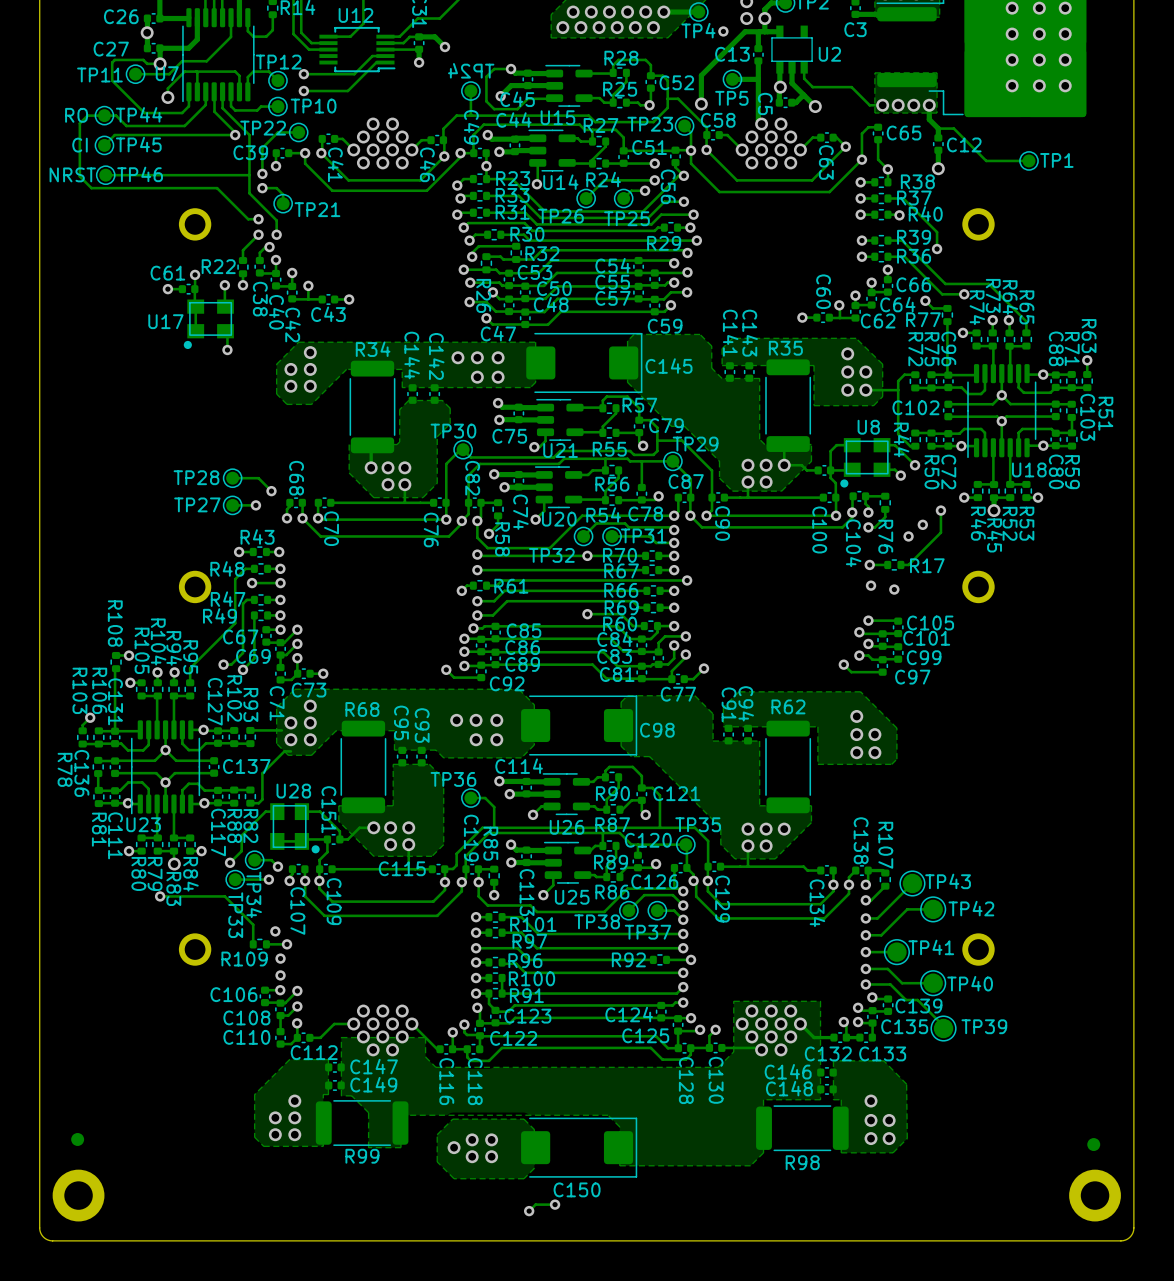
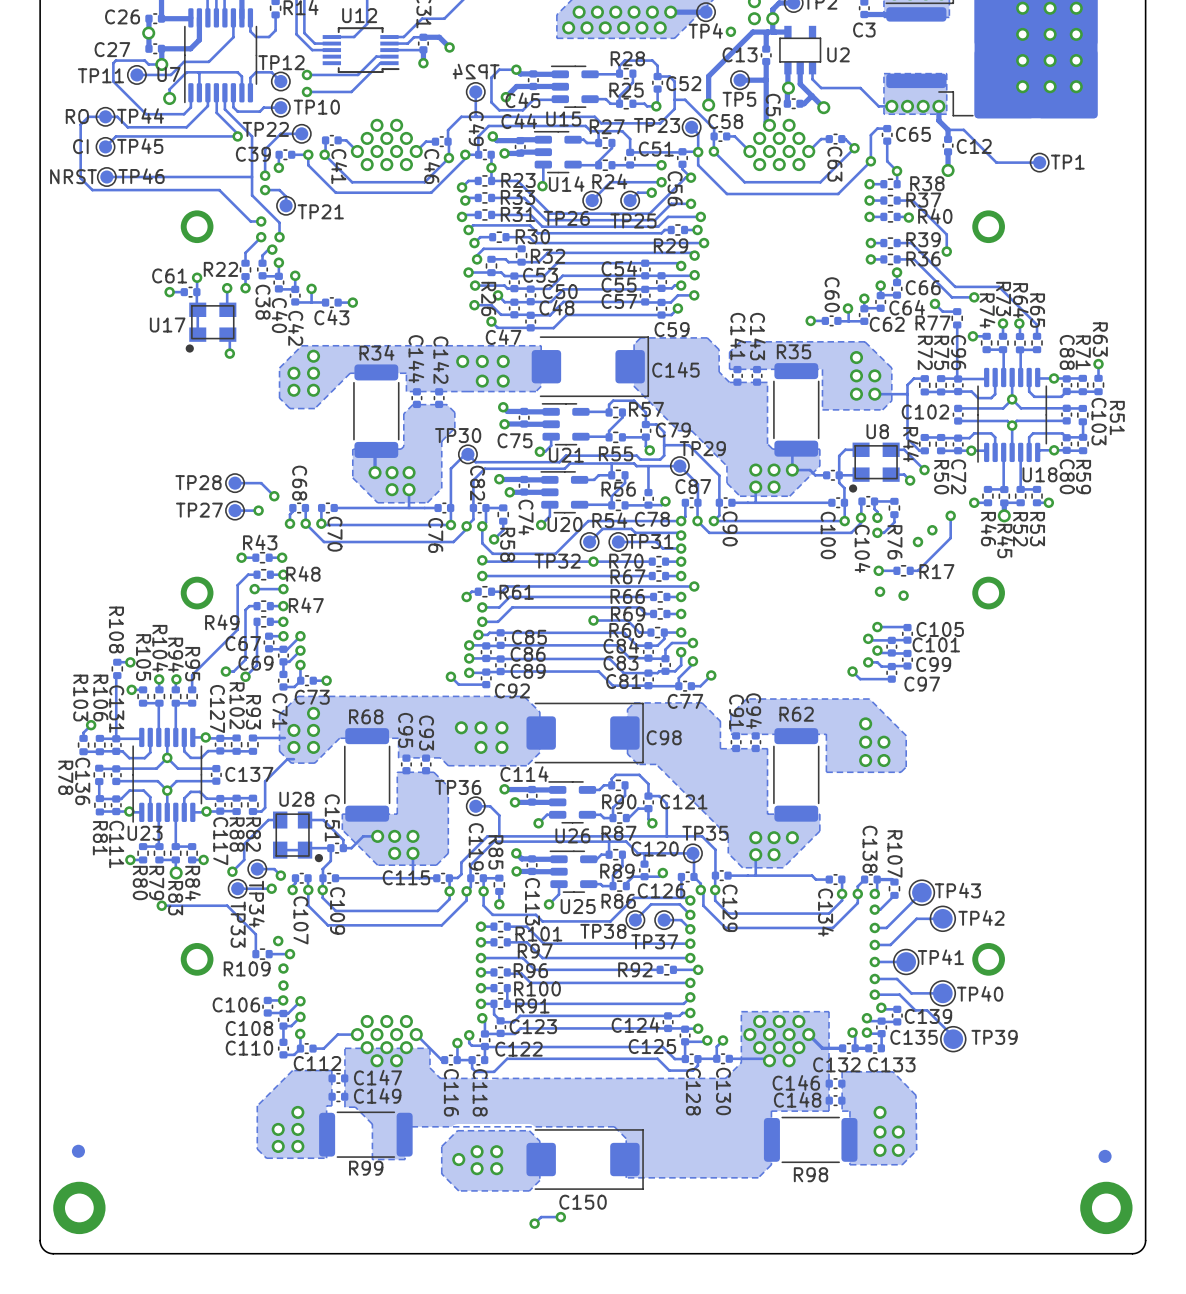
R48 name position: R48 (227, 568) -> R48 (303, 573)
R47 name position: R47 (228, 599) -> R47 (306, 605)

